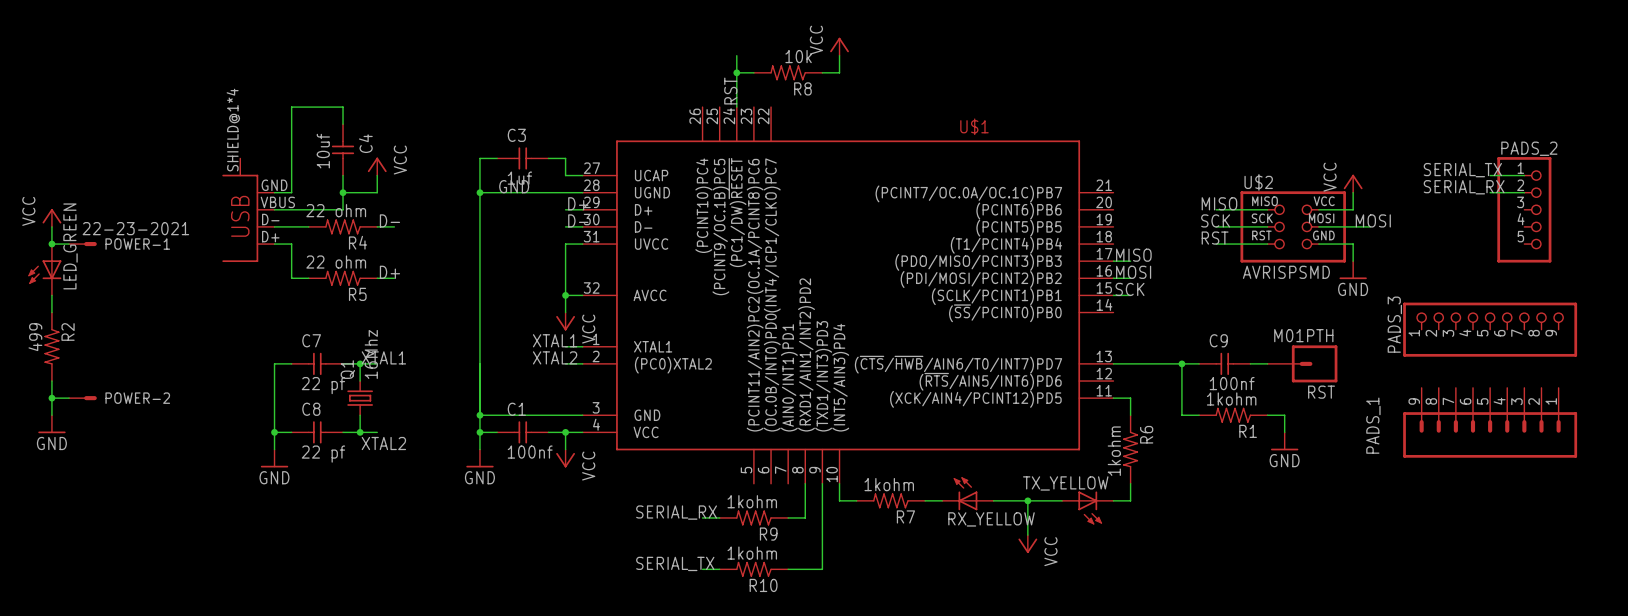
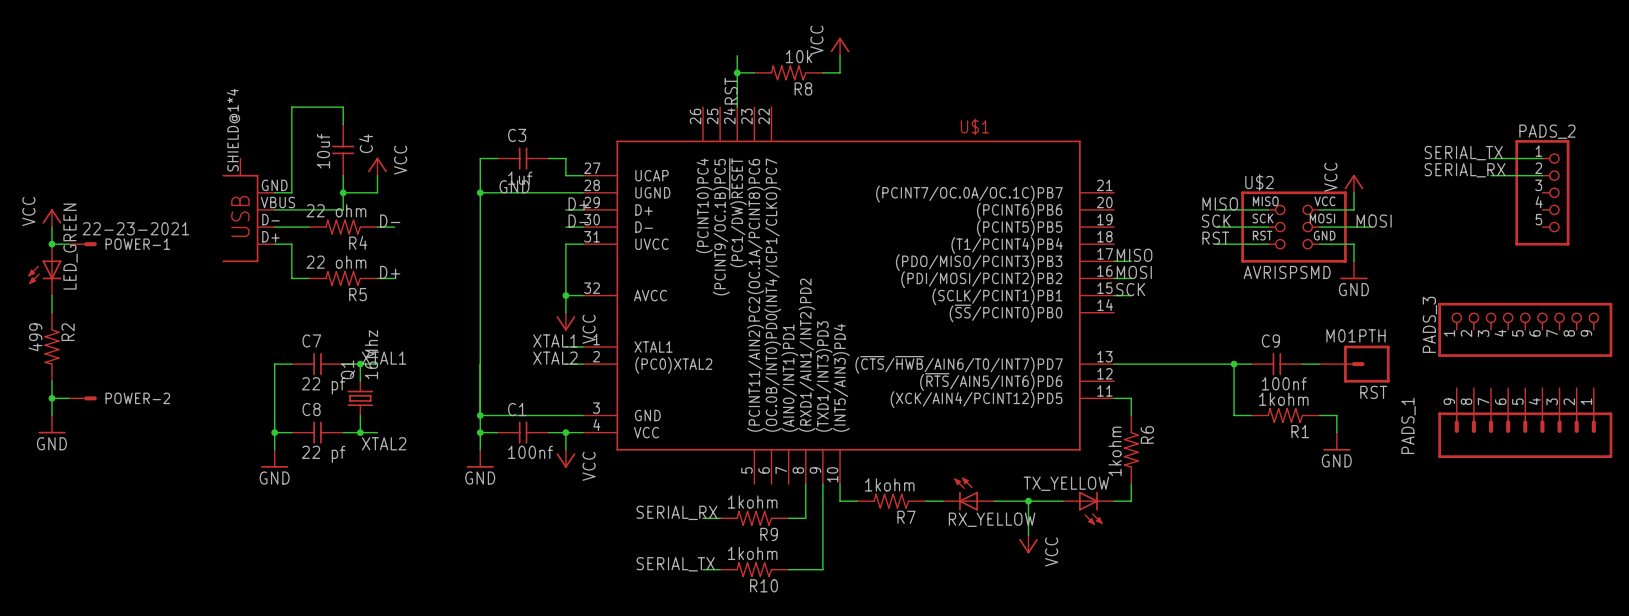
label: none -> SERIAL_TX (1463, 153)
label: SERIAL_TX (1462, 170) -> SERIAL_RX (1465, 170)
label: SERIAL_RX (1464, 187) -> none
wire: (1490, 192) (1524, 192) -> none
PADS_2 position: (1524, 209) -> (1542, 192)
PADS_3 position: (1490, 329) -> (1525, 329)
wire: (1181, 363) (1181, 415) (1199, 415) -> (1234, 364) (1234, 415) (1251, 415)
junction: (1181, 363) -> none
C9 position: (1224, 363) -> (1276, 364)
junction: none -> (1234, 364)
RST position: (1302, 363) -> (1354, 364)
R1 position: (1233, 415) -> (1285, 415)
wire: (1267, 415) (1284, 415) (1284, 432) -> (1319, 415) (1336, 415) (1336, 432)
PADS_1 position: (1490, 422) -> (1525, 423)
power symbol position: GND (1284, 441) -> GND (1336, 441)

